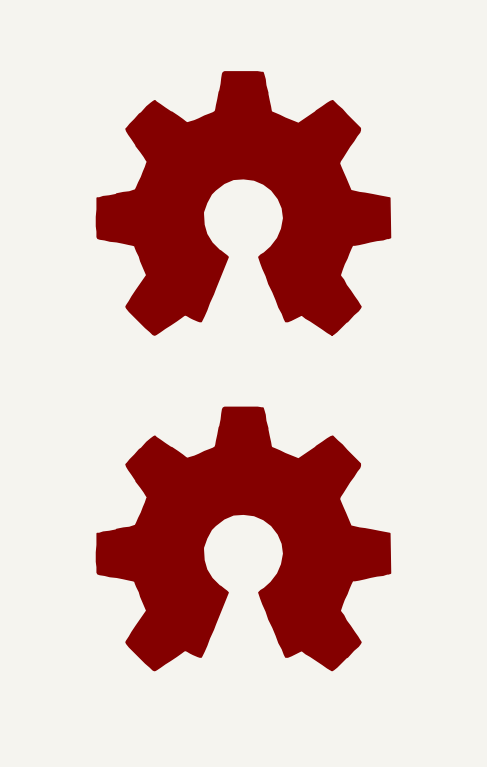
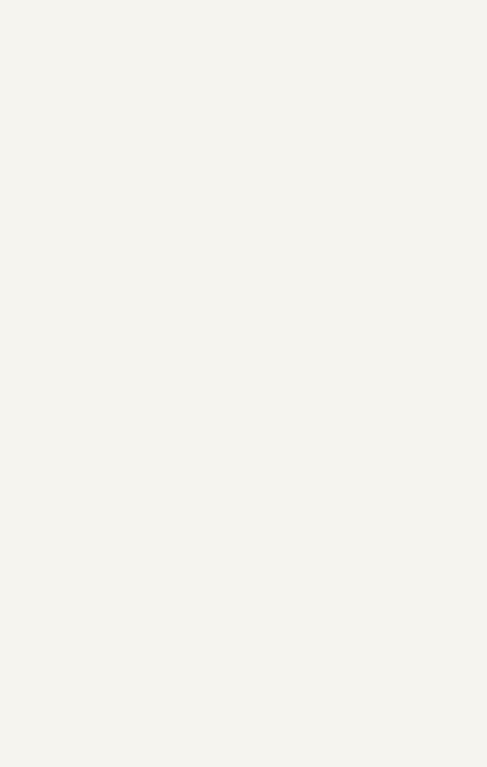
part: (243, 203) -> none
part: (243, 538) -> none

